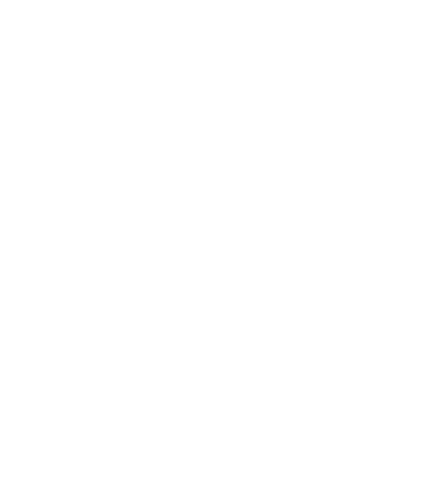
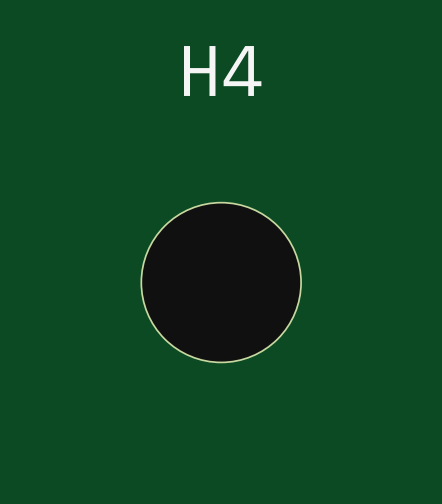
H4: none -> (221, 282)

